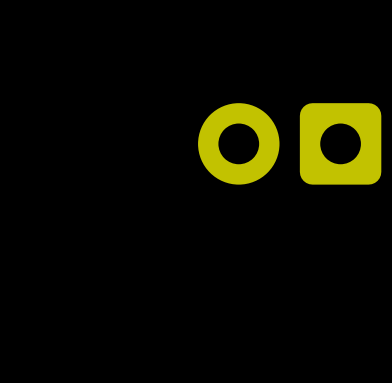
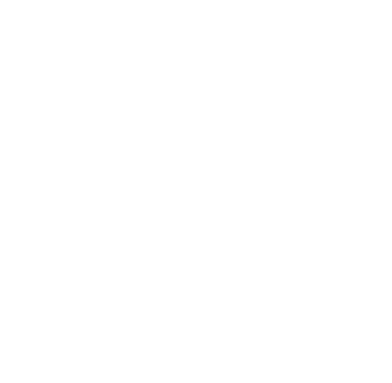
part: (289, 143) -> none

